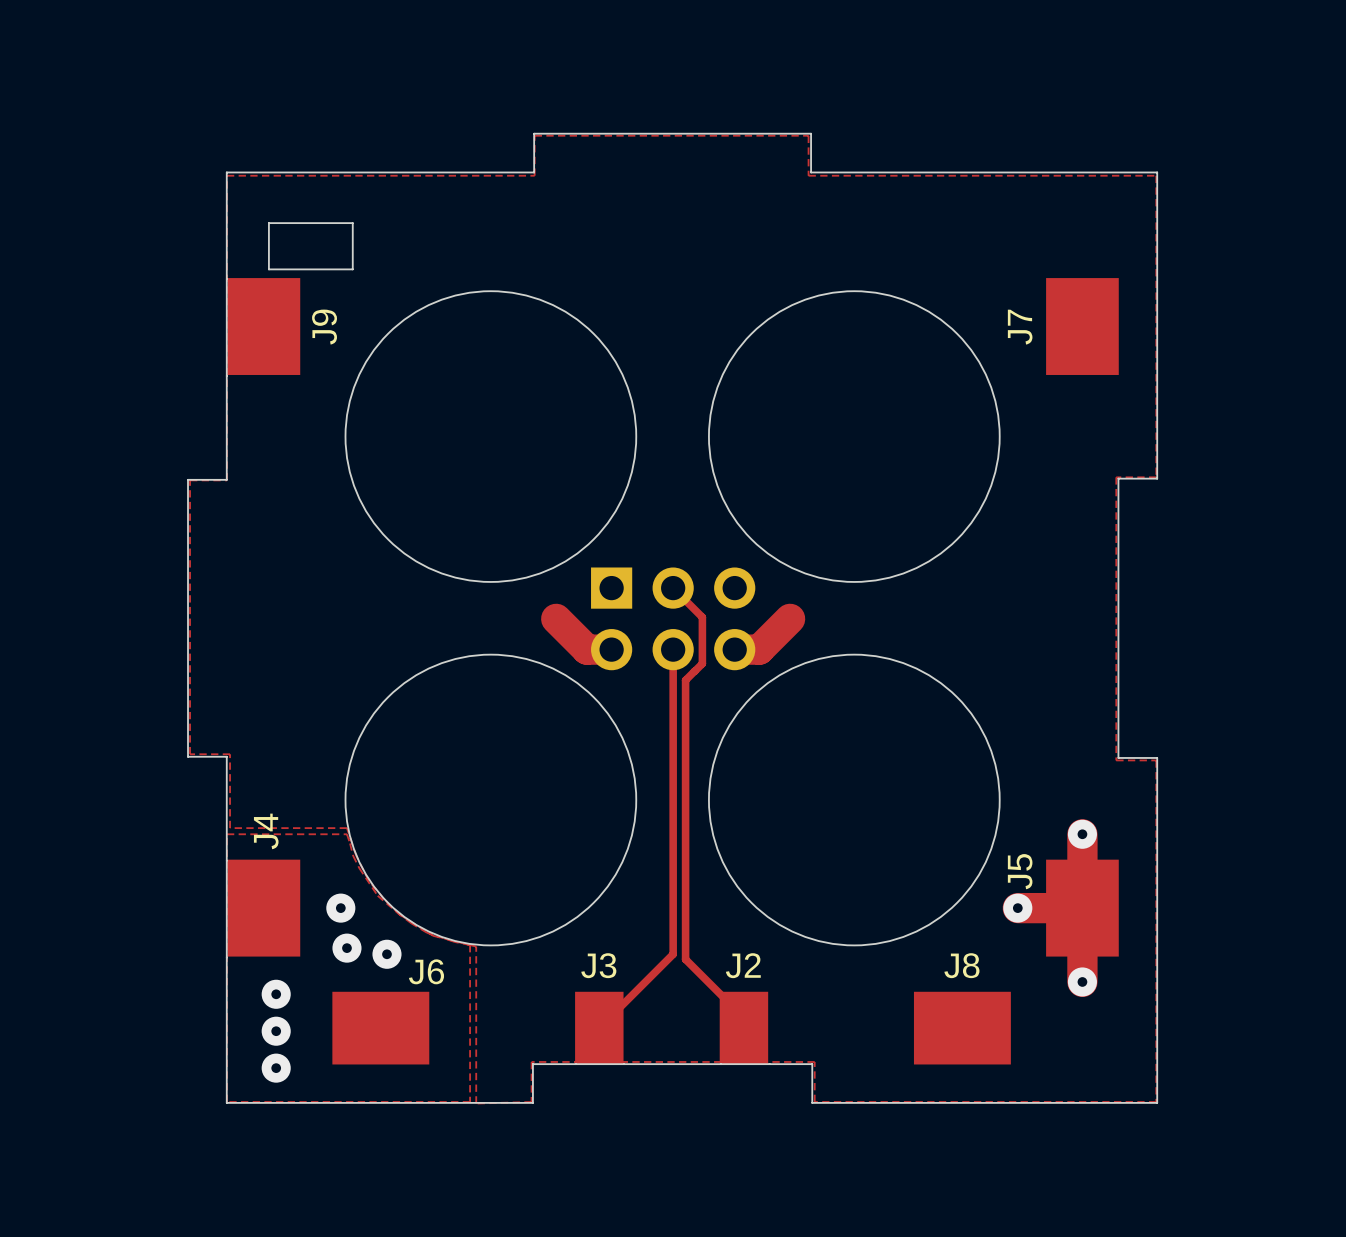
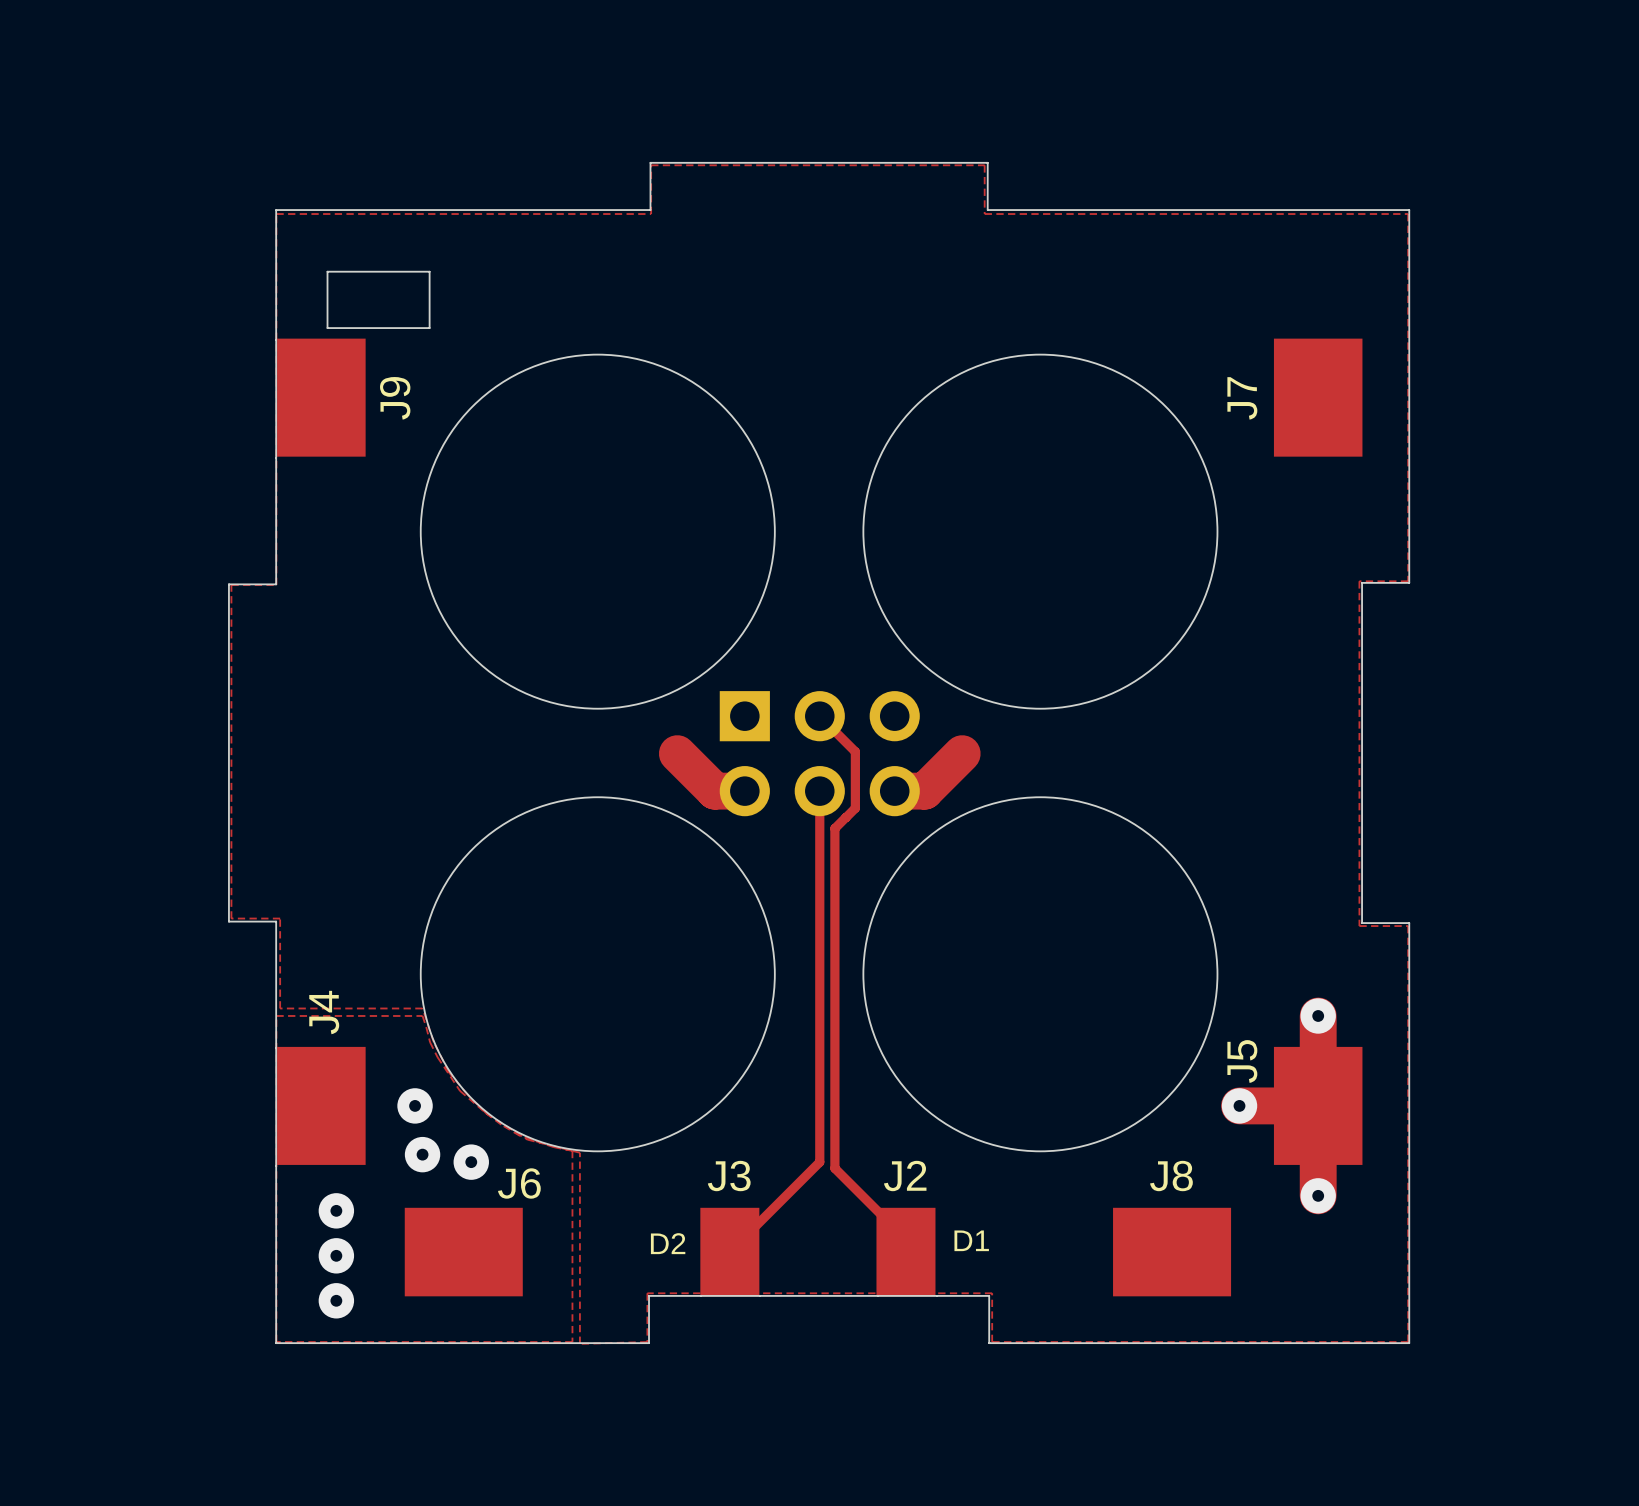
text: none -> D1 (971, 1240)
text: none -> D2 (668, 1243)

